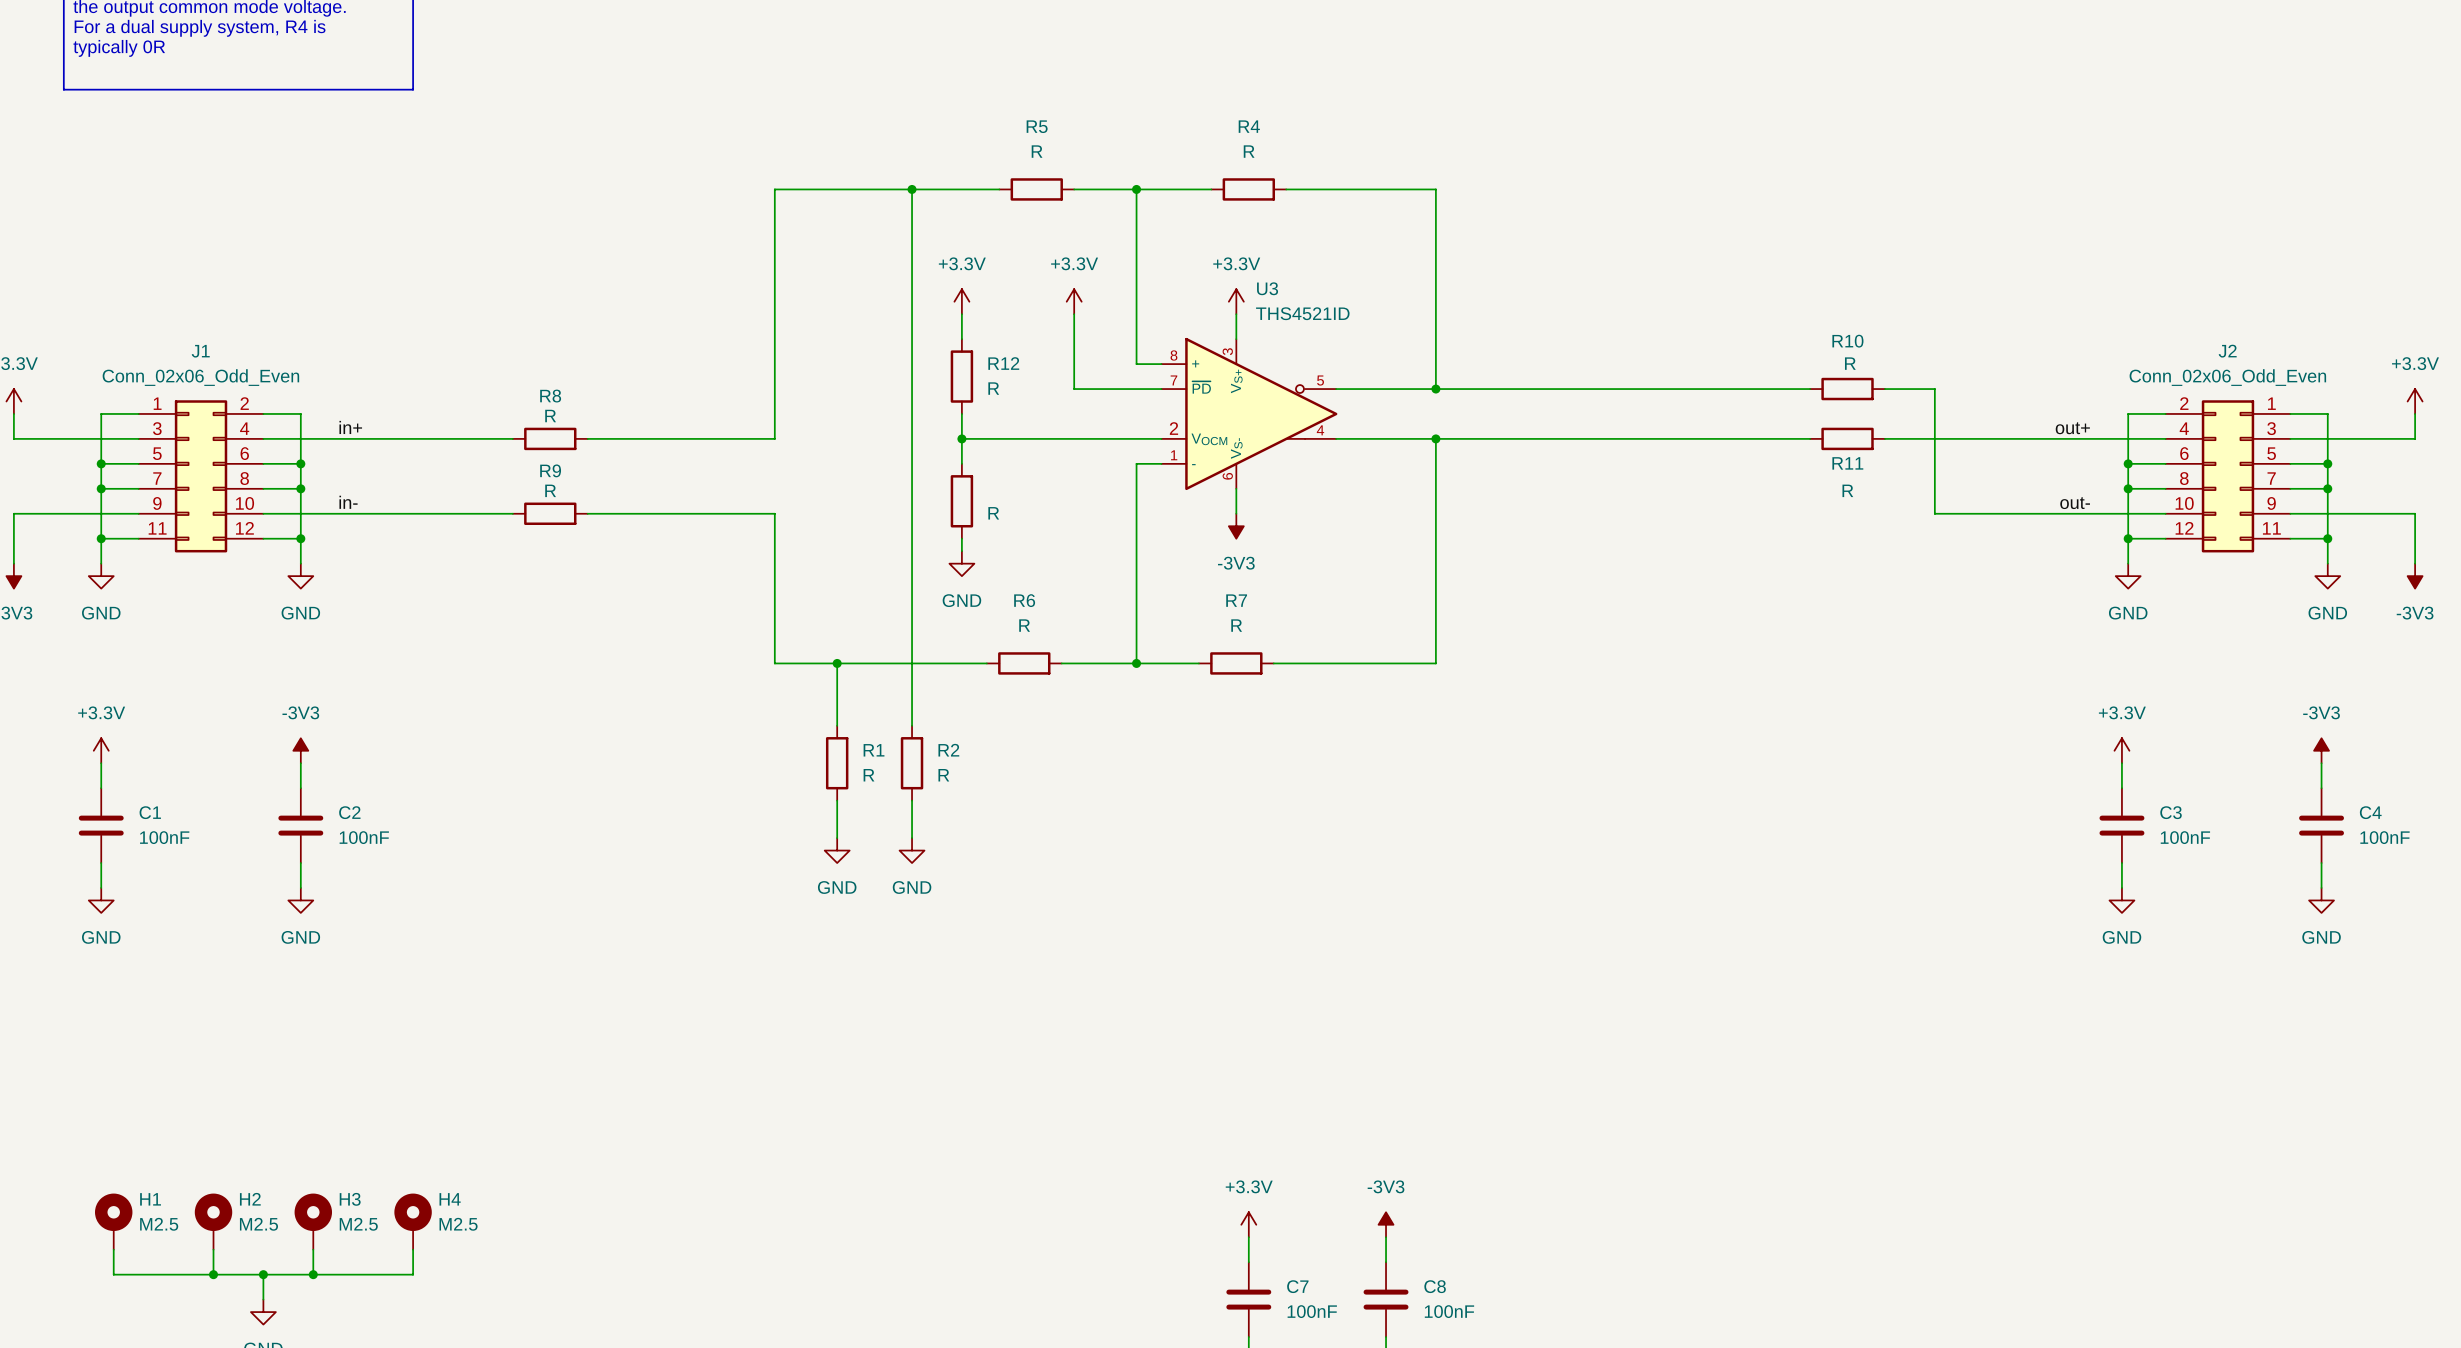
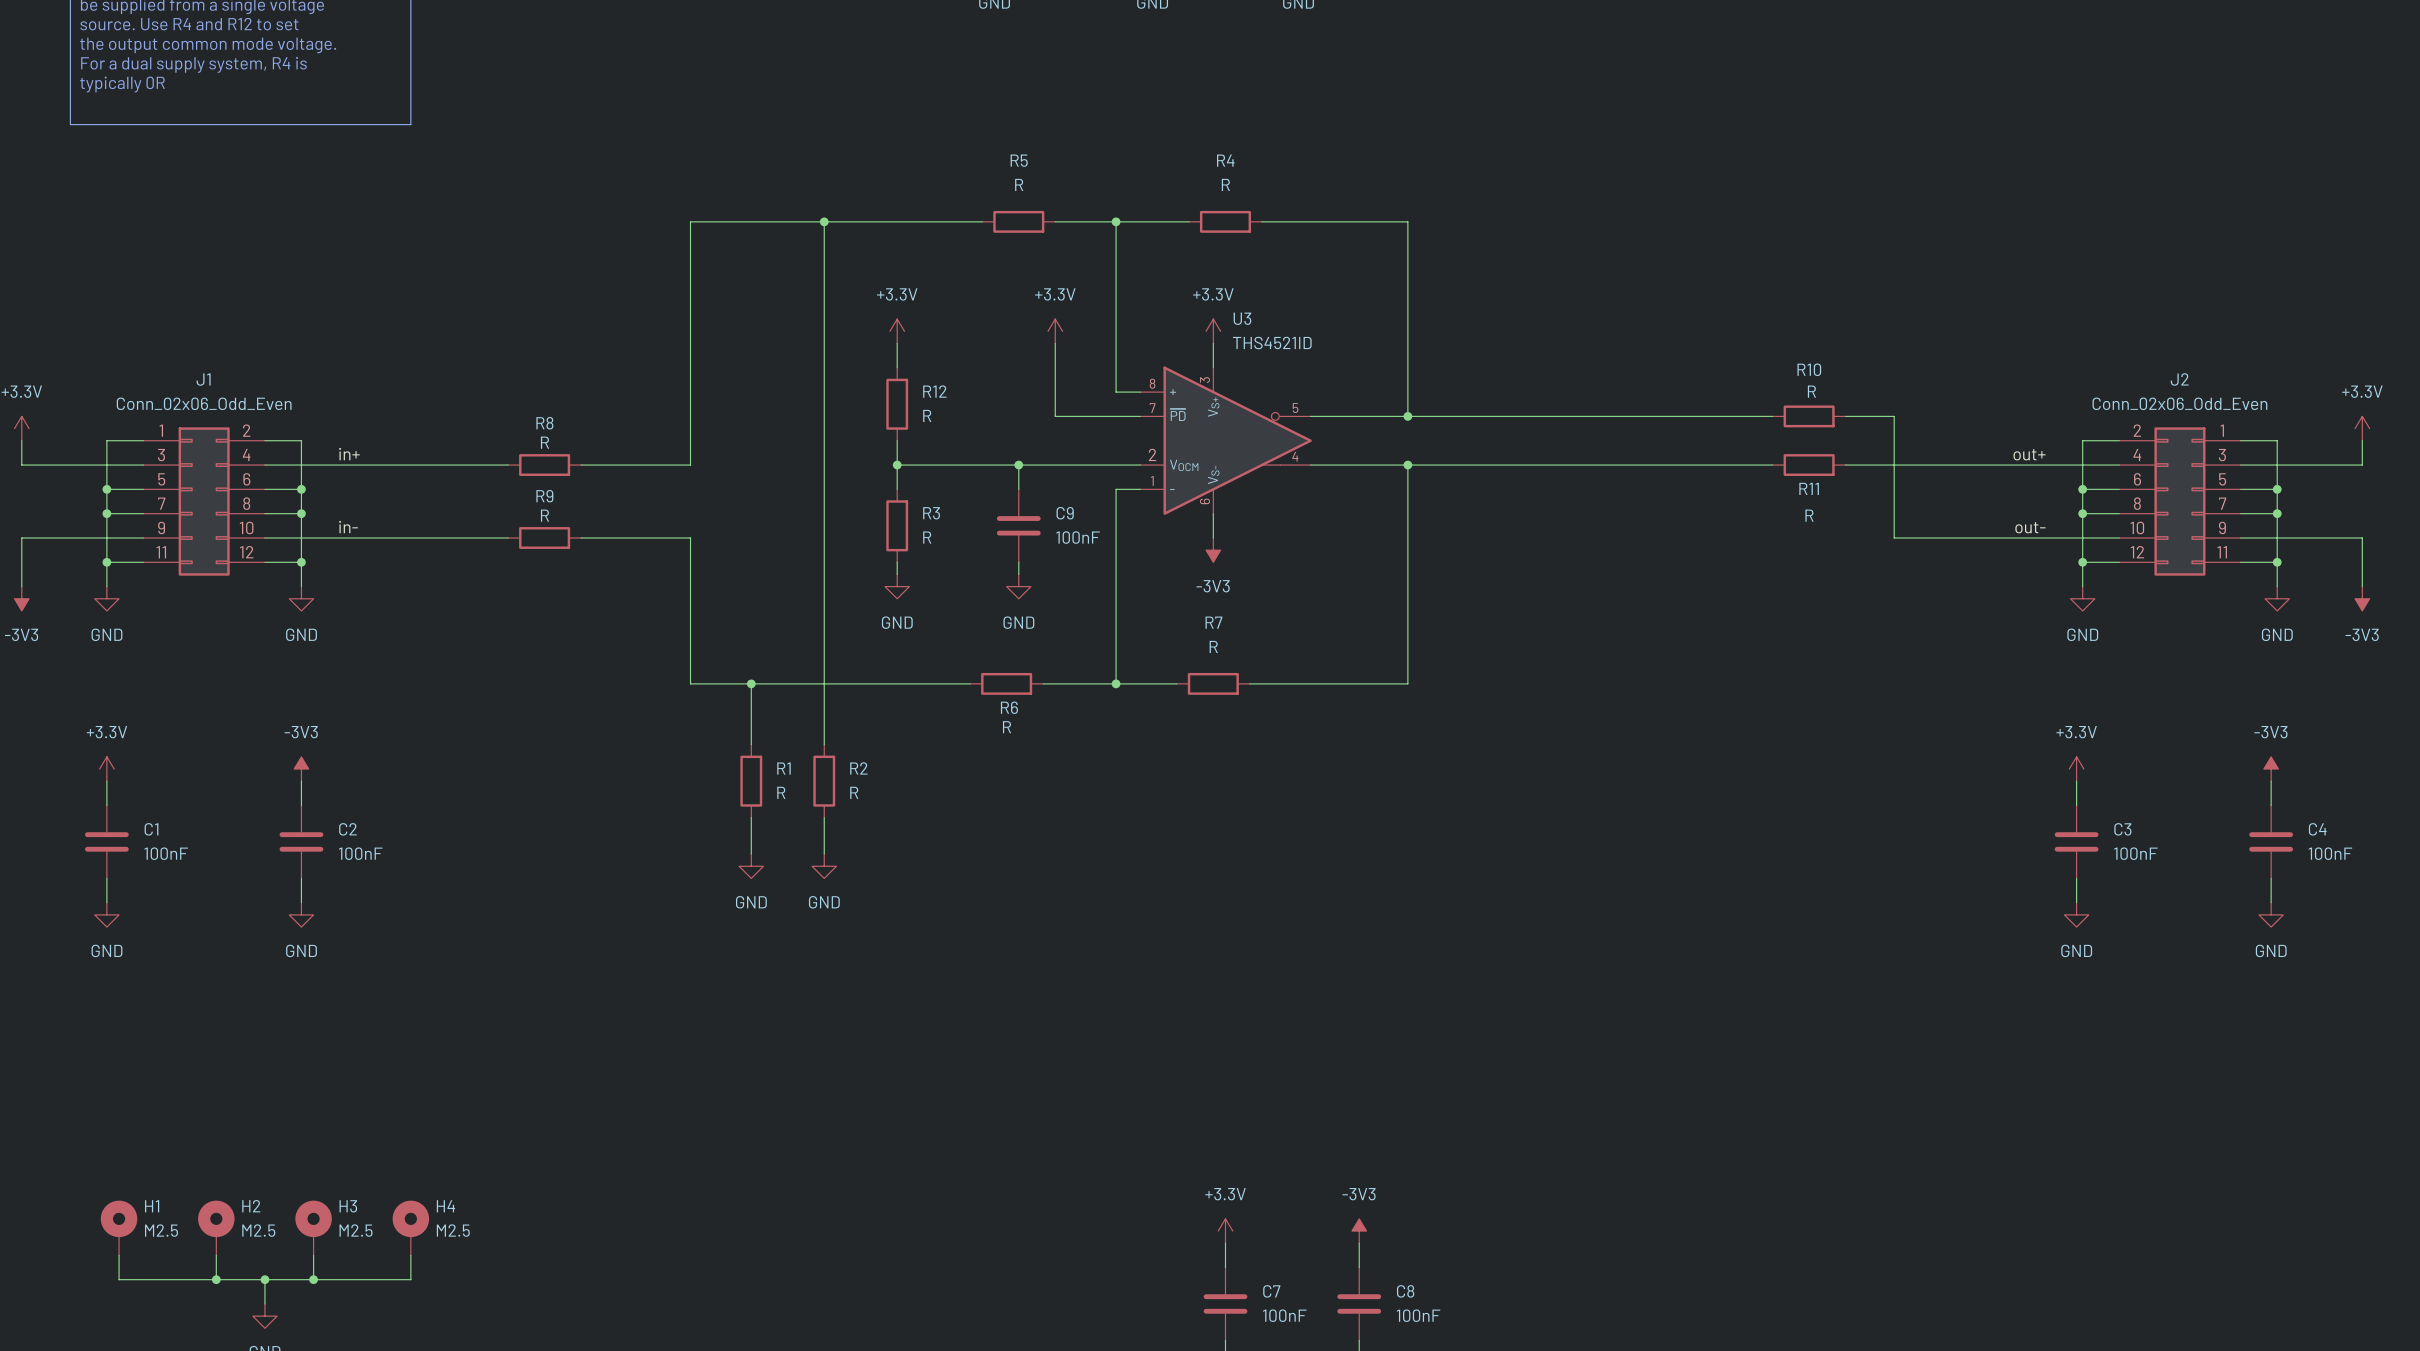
wire: (774, 189) (774, 438) (699, 438) -> (763, 221) (690, 221) (690, 465)
wire: none -> (824, 221) (824, 683)
junction: none -> (824, 221)
wire: (912, 189) (912, 314) -> none
junction: (912, 189) -> none
power symbol position: +3.3V (961, 301) -> +3.3V (897, 331)
wire: (961, 314) (961, 339) -> (1018, 465) (1018, 489)
wire: (912, 339) (912, 413) -> none
R12 position: (961, 376) -> (897, 404)
wire: (961, 413) (961, 463) -> none
wire: none -> (897, 465) (945, 465)
junction: none -> (897, 465)
junction: (961, 438) -> none
junction: none -> (1018, 465)
wire: (912, 463) (912, 538) -> none
R3: none -> R (897, 525)
part: R (961, 501) -> none
C9: none -> 100nF (1018, 525)
wire: (699, 513) (774, 513) (774, 663) -> (690, 537) (690, 683) (763, 683)
wire: (961, 538) (961, 551) -> (1018, 562) (1018, 574)
wire: (912, 551) (912, 725) -> none
power symbol: none -> GND (897, 586)
power symbol: GND (961, 563) -> none
power symbol: none -> GND (1018, 586)
R6 name position: R6 (1024, 600) -> R6 (1009, 707)
R6 value position: R (1024, 625) -> R (1007, 727)
wire: none -> (751, 683) (751, 744)
junction: none -> (751, 683)
junction: (837, 663) -> none
R1 name: R1 (874, 750) -> R2 (858, 768)
R1: none -> R (751, 781)
R2: R (912, 763) -> none
wire: (912, 800) (912, 838) -> (751, 817) (751, 854)
power symbol: none -> GND (751, 866)
power symbol: GND (912, 850) -> none

